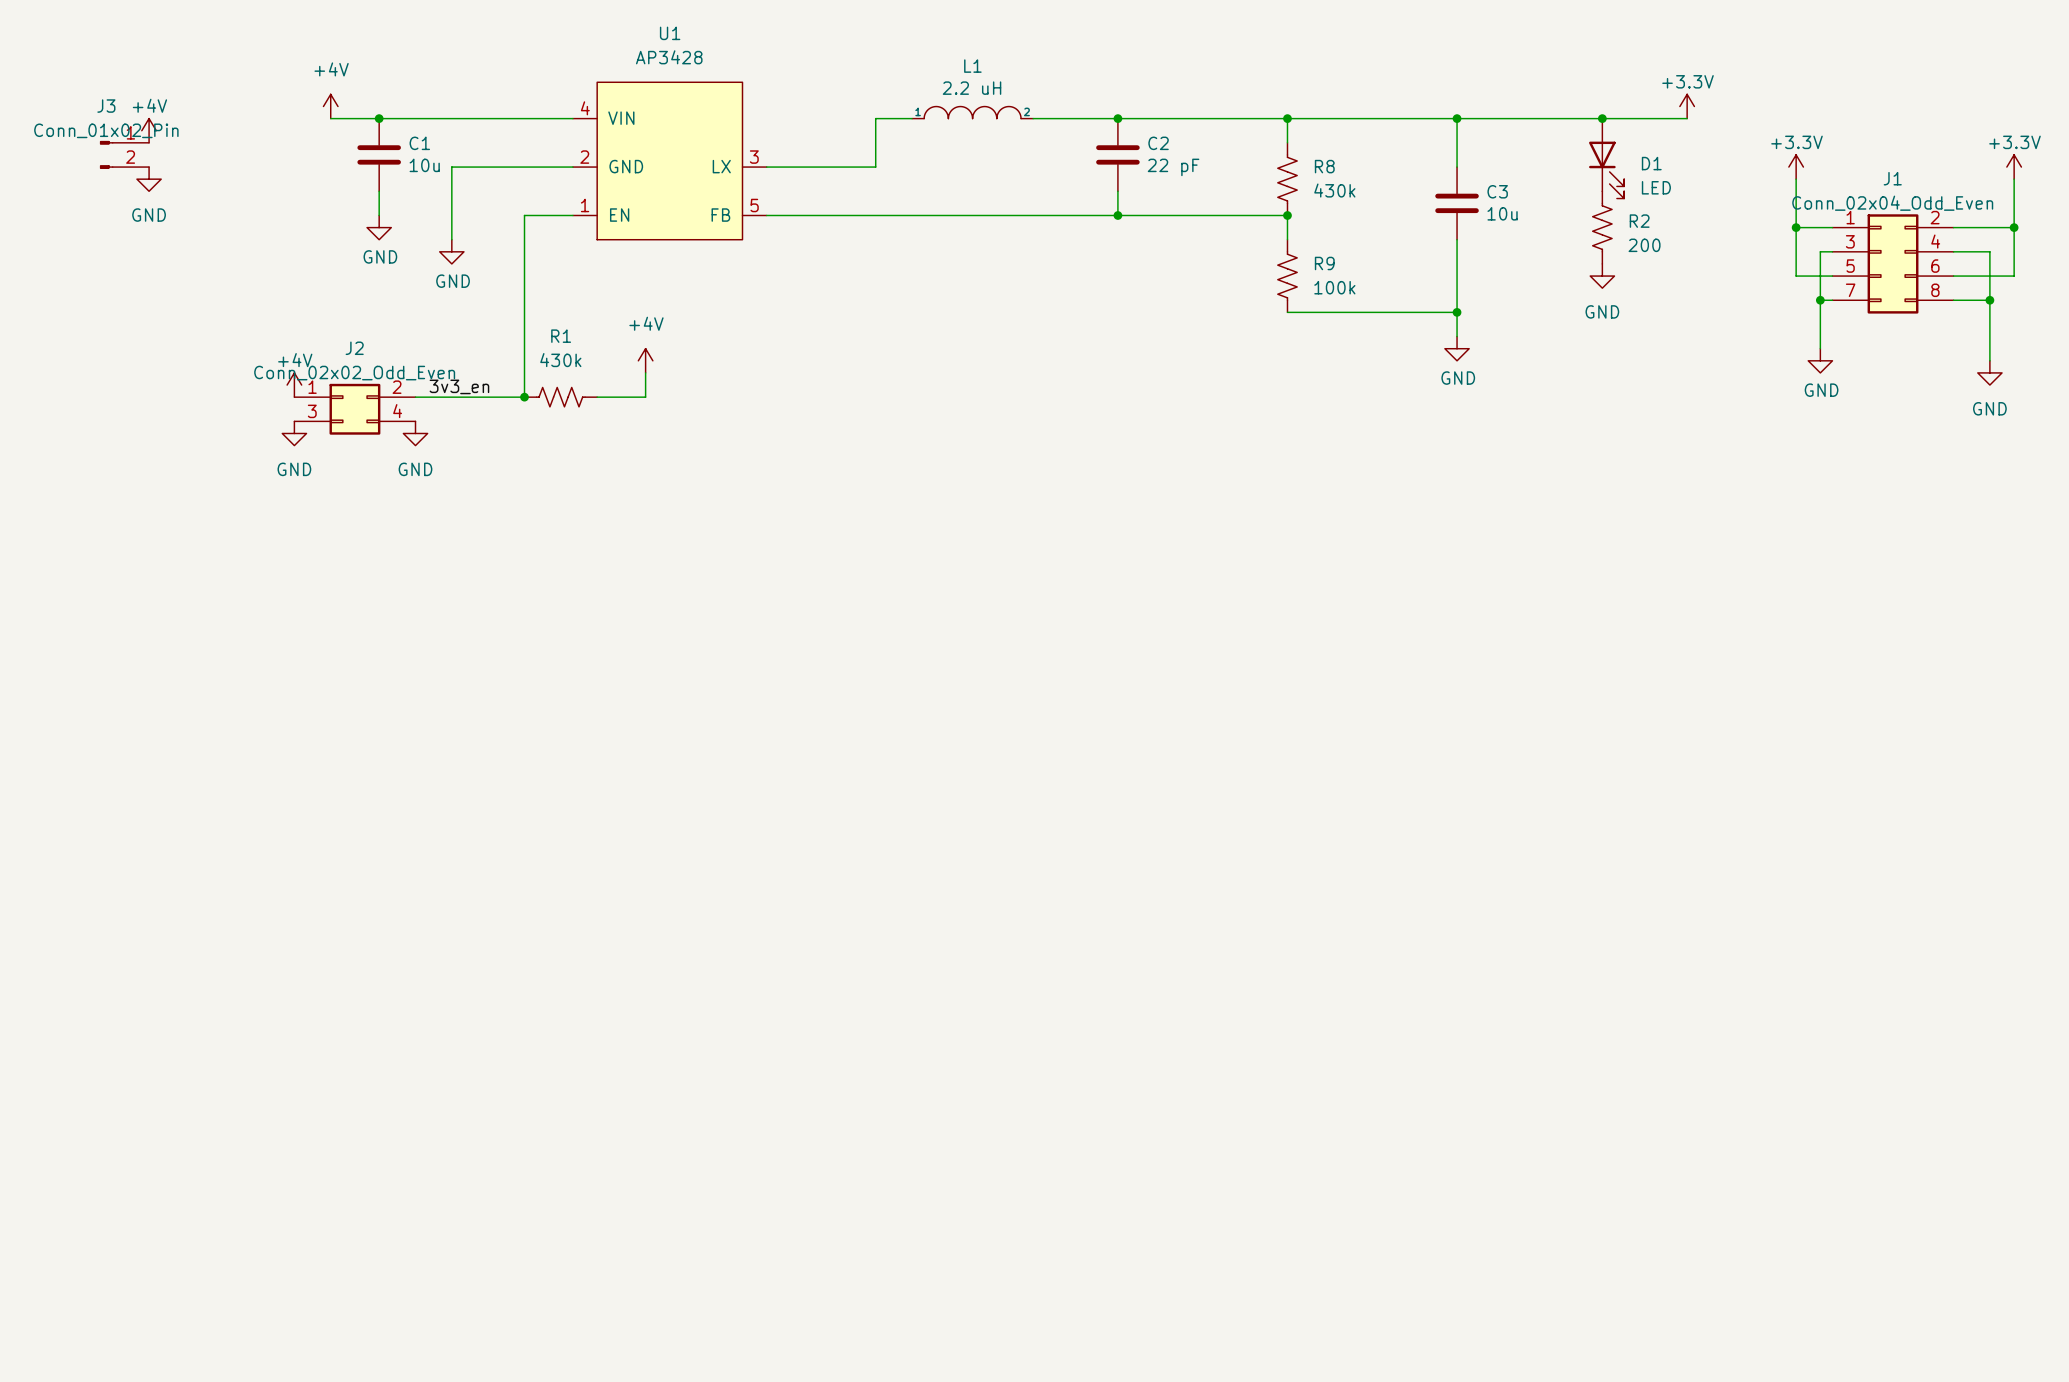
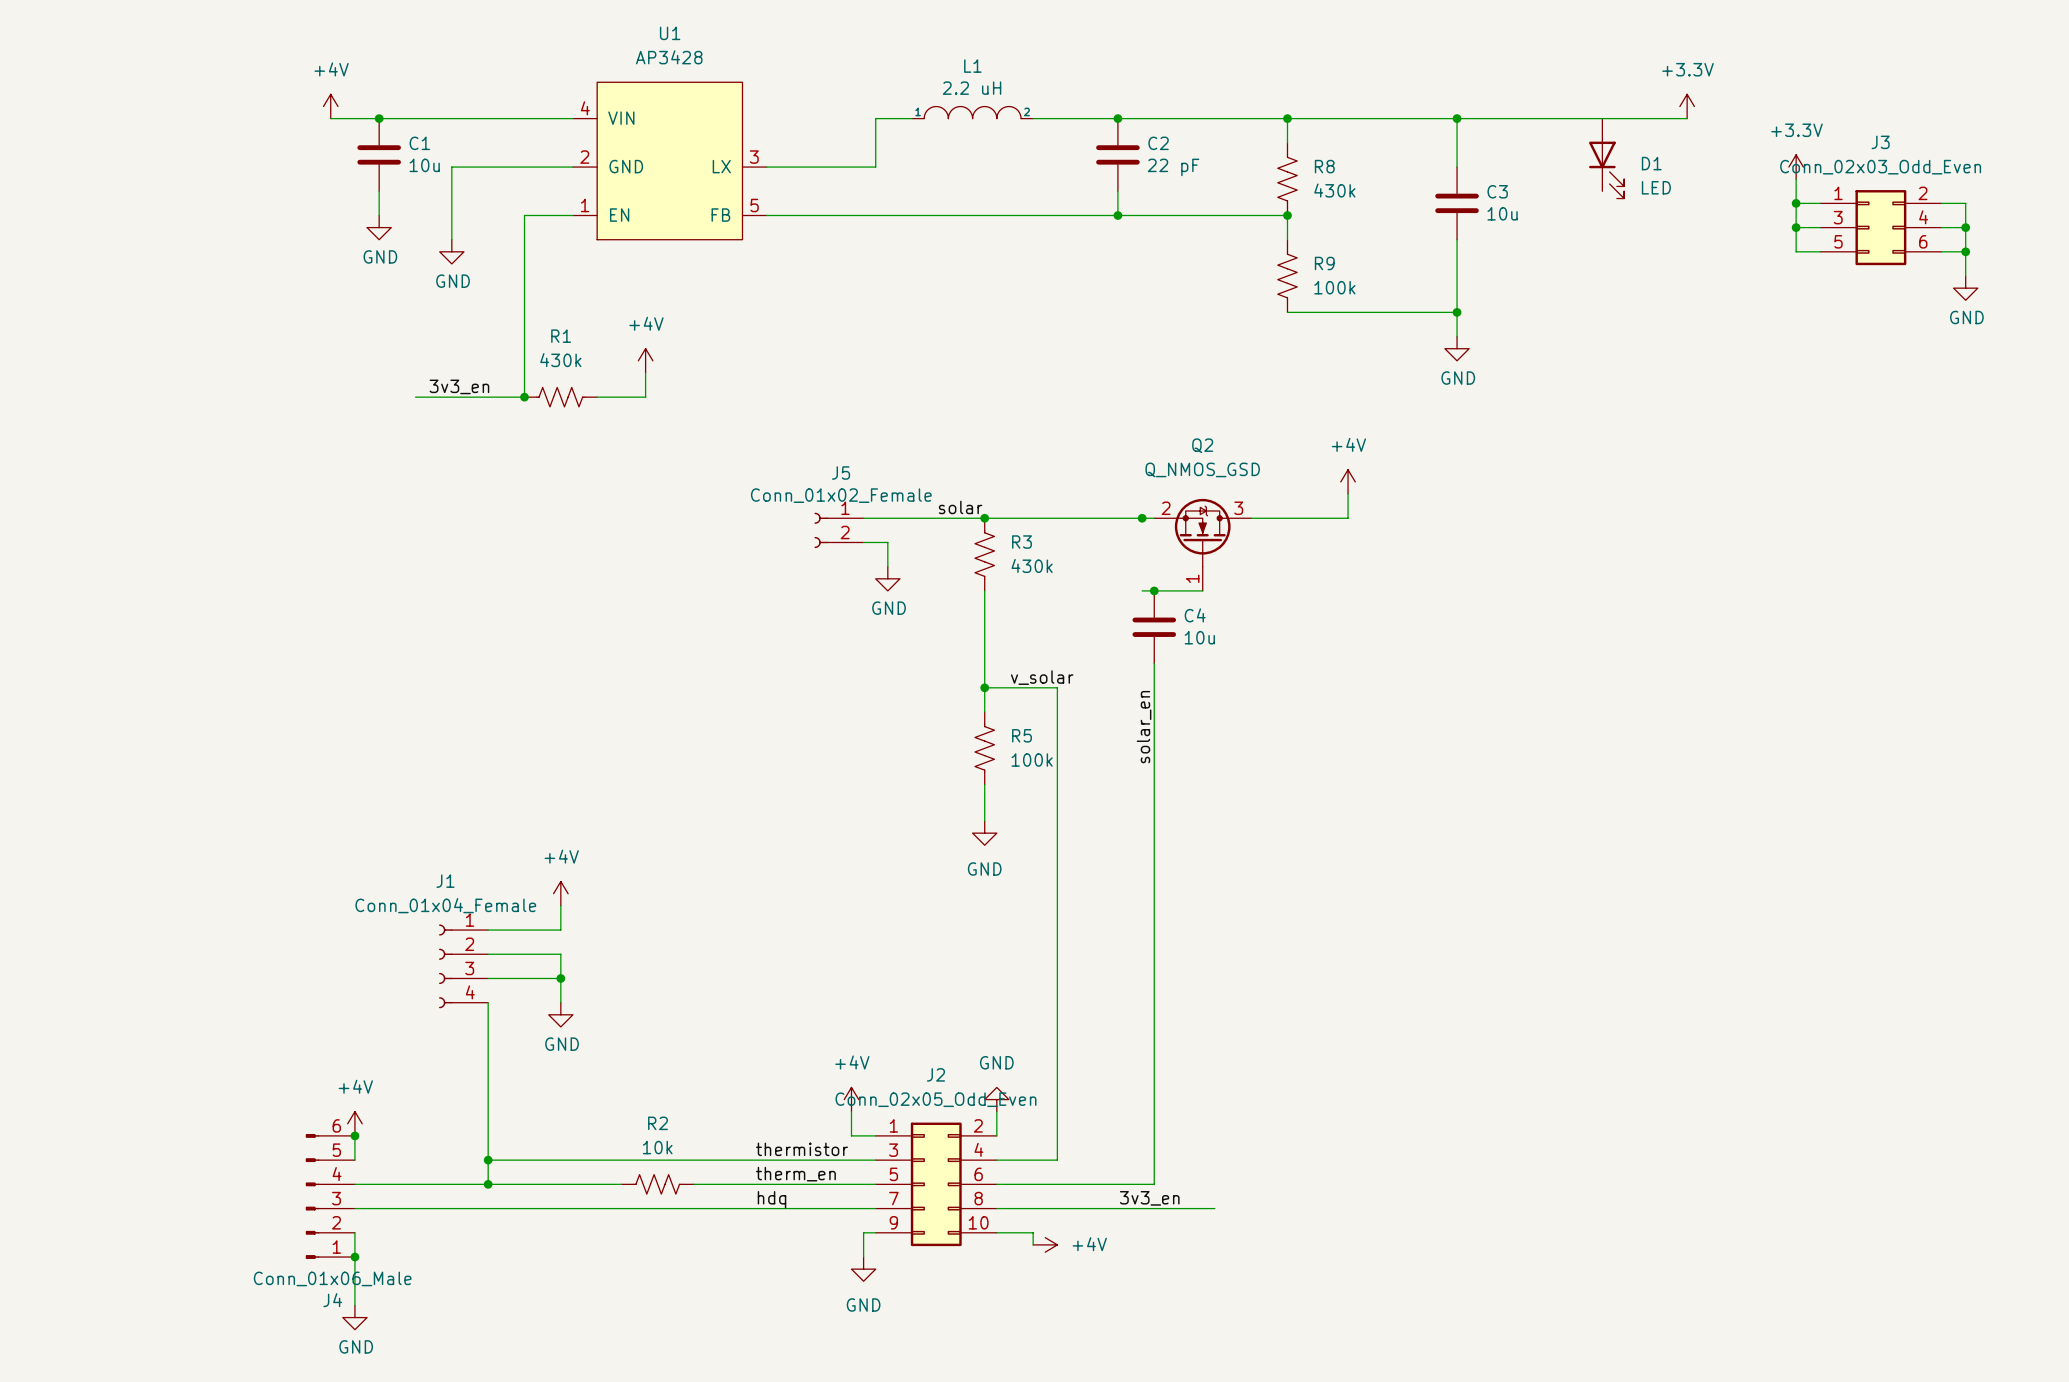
power symbol text position: +3.3V (1688, 81) -> +3.3V (1688, 69)
J3 name position: J3 (106, 106) -> J3 (1880, 142)
junction: (1602, 118) -> none
J3 value: Conn_01x02_Pin (106, 130) -> Conn_02x03_Odd_Even (1880, 167)
power symbol: +4V (149, 130) -> none
J3 symbol: [99, 140, 150, 169] -> [1820, 190, 1942, 266]
power symbol text position: +3.3V (1797, 142) -> +3.3V (1797, 130)
power symbol: +3.3V (2014, 167) -> none
power symbol: GND (149, 179) -> none
wire: (2014, 179) (2014, 276) (1953, 276) -> none
wire: none -> (1796, 203) (1820, 203)
junction: none -> (1796, 203)
J1 value: Conn_02x04_Odd_Even (1892, 203) -> Conn_01x04_Female (445, 905)
wire: none -> (1941, 203) (1965, 203) (1965, 276)
J1 symbol: [1832, 214, 1954, 314] -> [439, 924, 489, 1009]
R2 name position: R2 (1639, 221) -> R2 (658, 1123)
R2 rotation: 0° (1602, 227) -> 90° clockwise (657, 1184)
R2 position: (1602, 227) -> (657, 1184)
wire: (1965, 227) (2014, 227) -> none
junction: none -> (1965, 227)
junction: (2014, 227) -> none
R2 value: 200 (1644, 245) -> 10k (657, 1147)
wire: (1796, 251) (1796, 276) (1832, 276) -> (1796, 251) (1820, 251)
wire: (1832, 251) (1820, 251) (1820, 348) -> none
wire: (1965, 251) (1989, 251) (1989, 360) -> none
junction: none -> (1965, 251)
power symbol: GND (1602, 276) -> none
power symbol: none -> GND (1965, 288)
junction: (1820, 300) -> none
wire: (1953, 300) (1989, 300) -> none
junction: (1989, 300) -> none
J2 name position: J2 (354, 348) -> J2 (935, 1074)
power symbol: GND (1820, 360) -> none
power symbol: GND (1989, 372) -> none
J2 value: Conn_02x02_Odd_Even (354, 373) -> Conn_02x05_Odd_Even (935, 1099)
J2 symbol: [294, 383, 416, 435] -> [875, 1122, 997, 1247]
power symbol: +4V (294, 385) -> none
power symbol: GND (294, 433) -> none
power symbol: GND (415, 433) -> none
power symbol: none -> +4V (1348, 481)
wire: none -> (1348, 494) (1348, 518) (1251, 518)
label: none -> solar (960, 507)
wire: none -> (863, 518) (1154, 518)
junction: none -> (984, 518)
junction: none -> (1142, 518)
J5: none -> Conn_01x02_Female (839, 530)
wire: none -> (863, 542) (887, 542) (887, 566)
Q2: none -> Q_NMOS_GSD (1202, 544)
R3: none -> 430k (984, 554)
power symbol: none -> GND (887, 578)
wire: none -> (984, 590) (984, 712)
wire: none -> (1142, 590) (1202, 590)
junction: none -> (1154, 590)
C4: none -> 10u (1154, 627)
wire: none -> (1154, 663) (1154, 1184) (996, 1184)
label: none -> v_solar (1042, 677)
wire: none -> (984, 687) (1057, 687) (1057, 1160) (996, 1160)
junction: none -> (984, 687)
label: none -> solar_en (1144, 727)
R5: none -> 100k (984, 748)
wire: none -> (984, 784) (984, 821)
power symbol: none -> GND (984, 833)
power symbol: none -> +4V (560, 893)
wire: none -> (560, 905) (560, 930) (488, 930)
wire: none -> (488, 954) (560, 954) (560, 1002)
wire: none -> (488, 978) (560, 978)
junction: none -> (560, 978)
wire: none -> (488, 1002) (488, 1184)
power symbol: none -> GND (560, 1014)
power symbol: none -> +4V (851, 1099)
power symbol: none -> GND (996, 1099)
wire: none -> (851, 1111) (851, 1135) (875, 1135)
wire: none -> (996, 1111) (996, 1135)
power symbol: none -> +4V (354, 1123)
wire: none -> (354, 1135) (354, 1160)
junction: none -> (354, 1135)
label: none -> thermistor (801, 1149)
wire: none -> (488, 1160) (875, 1160)
junction: none -> (488, 1160)
label: none -> therm_en (795, 1174)
wire: none -> (354, 1184) (621, 1184)
junction: none -> (488, 1184)
wire: none -> (694, 1184) (875, 1184)
J4: none -> Conn_01x06_Male (330, 1196)
label: none -> 3v3_en (1149, 1198)
label: none -> hdq (772, 1199)
wire: none -> (354, 1208) (875, 1208)
wire: none -> (996, 1208) (1214, 1208)
wire: none -> (354, 1232) (354, 1305)
wire: none -> (875, 1232) (863, 1232) (863, 1257)
wire: none -> (996, 1232) (1033, 1232) (1033, 1244)
power symbol: none -> +4V (1045, 1244)
junction: none -> (354, 1257)
power symbol: none -> GND (863, 1269)
power symbol: none -> GND (354, 1317)

